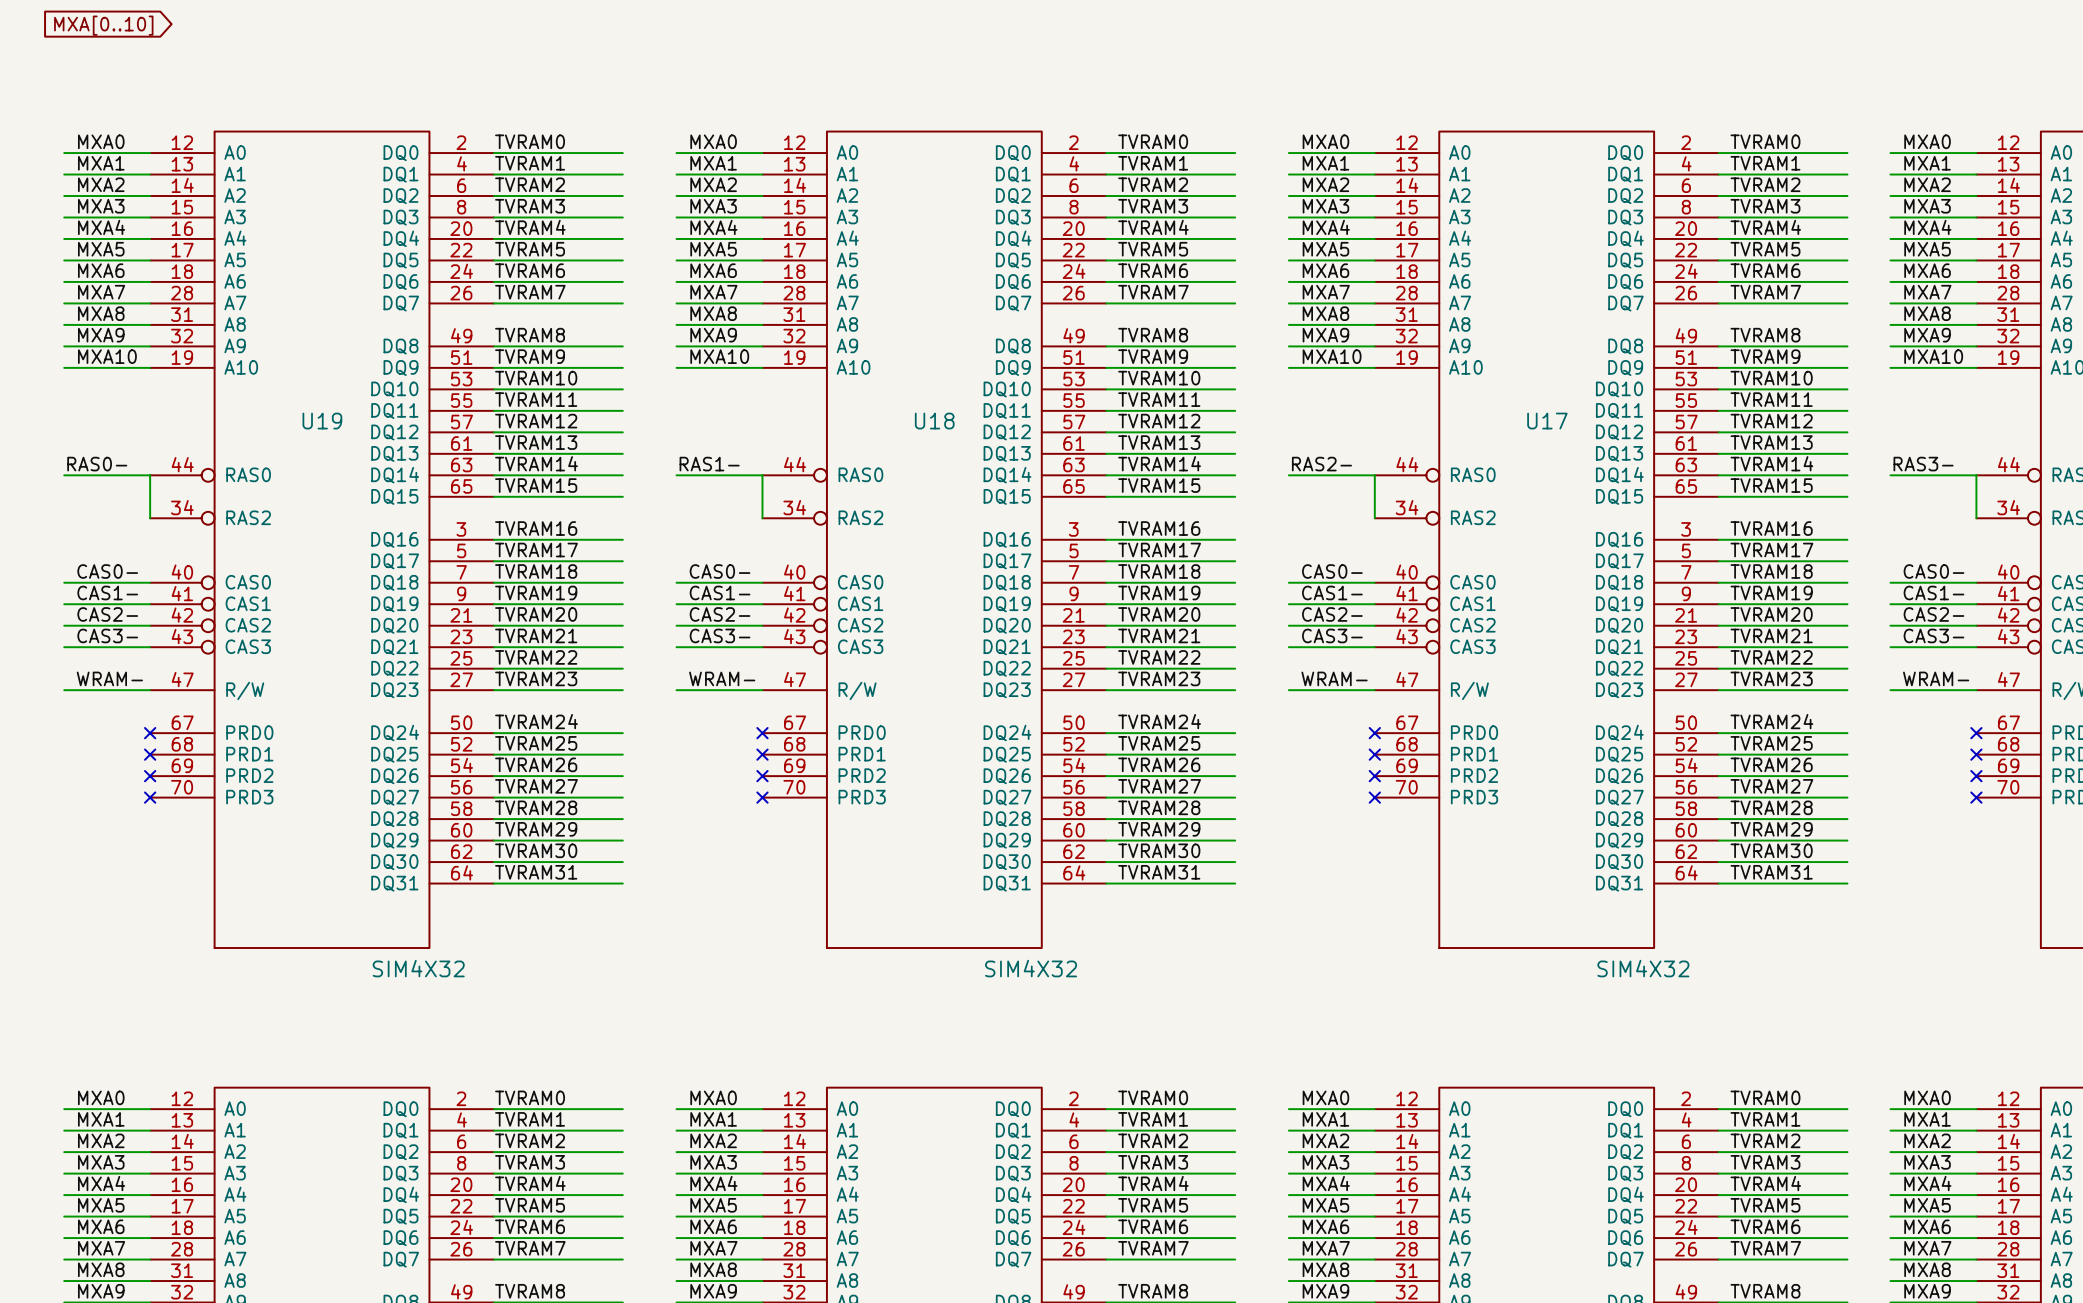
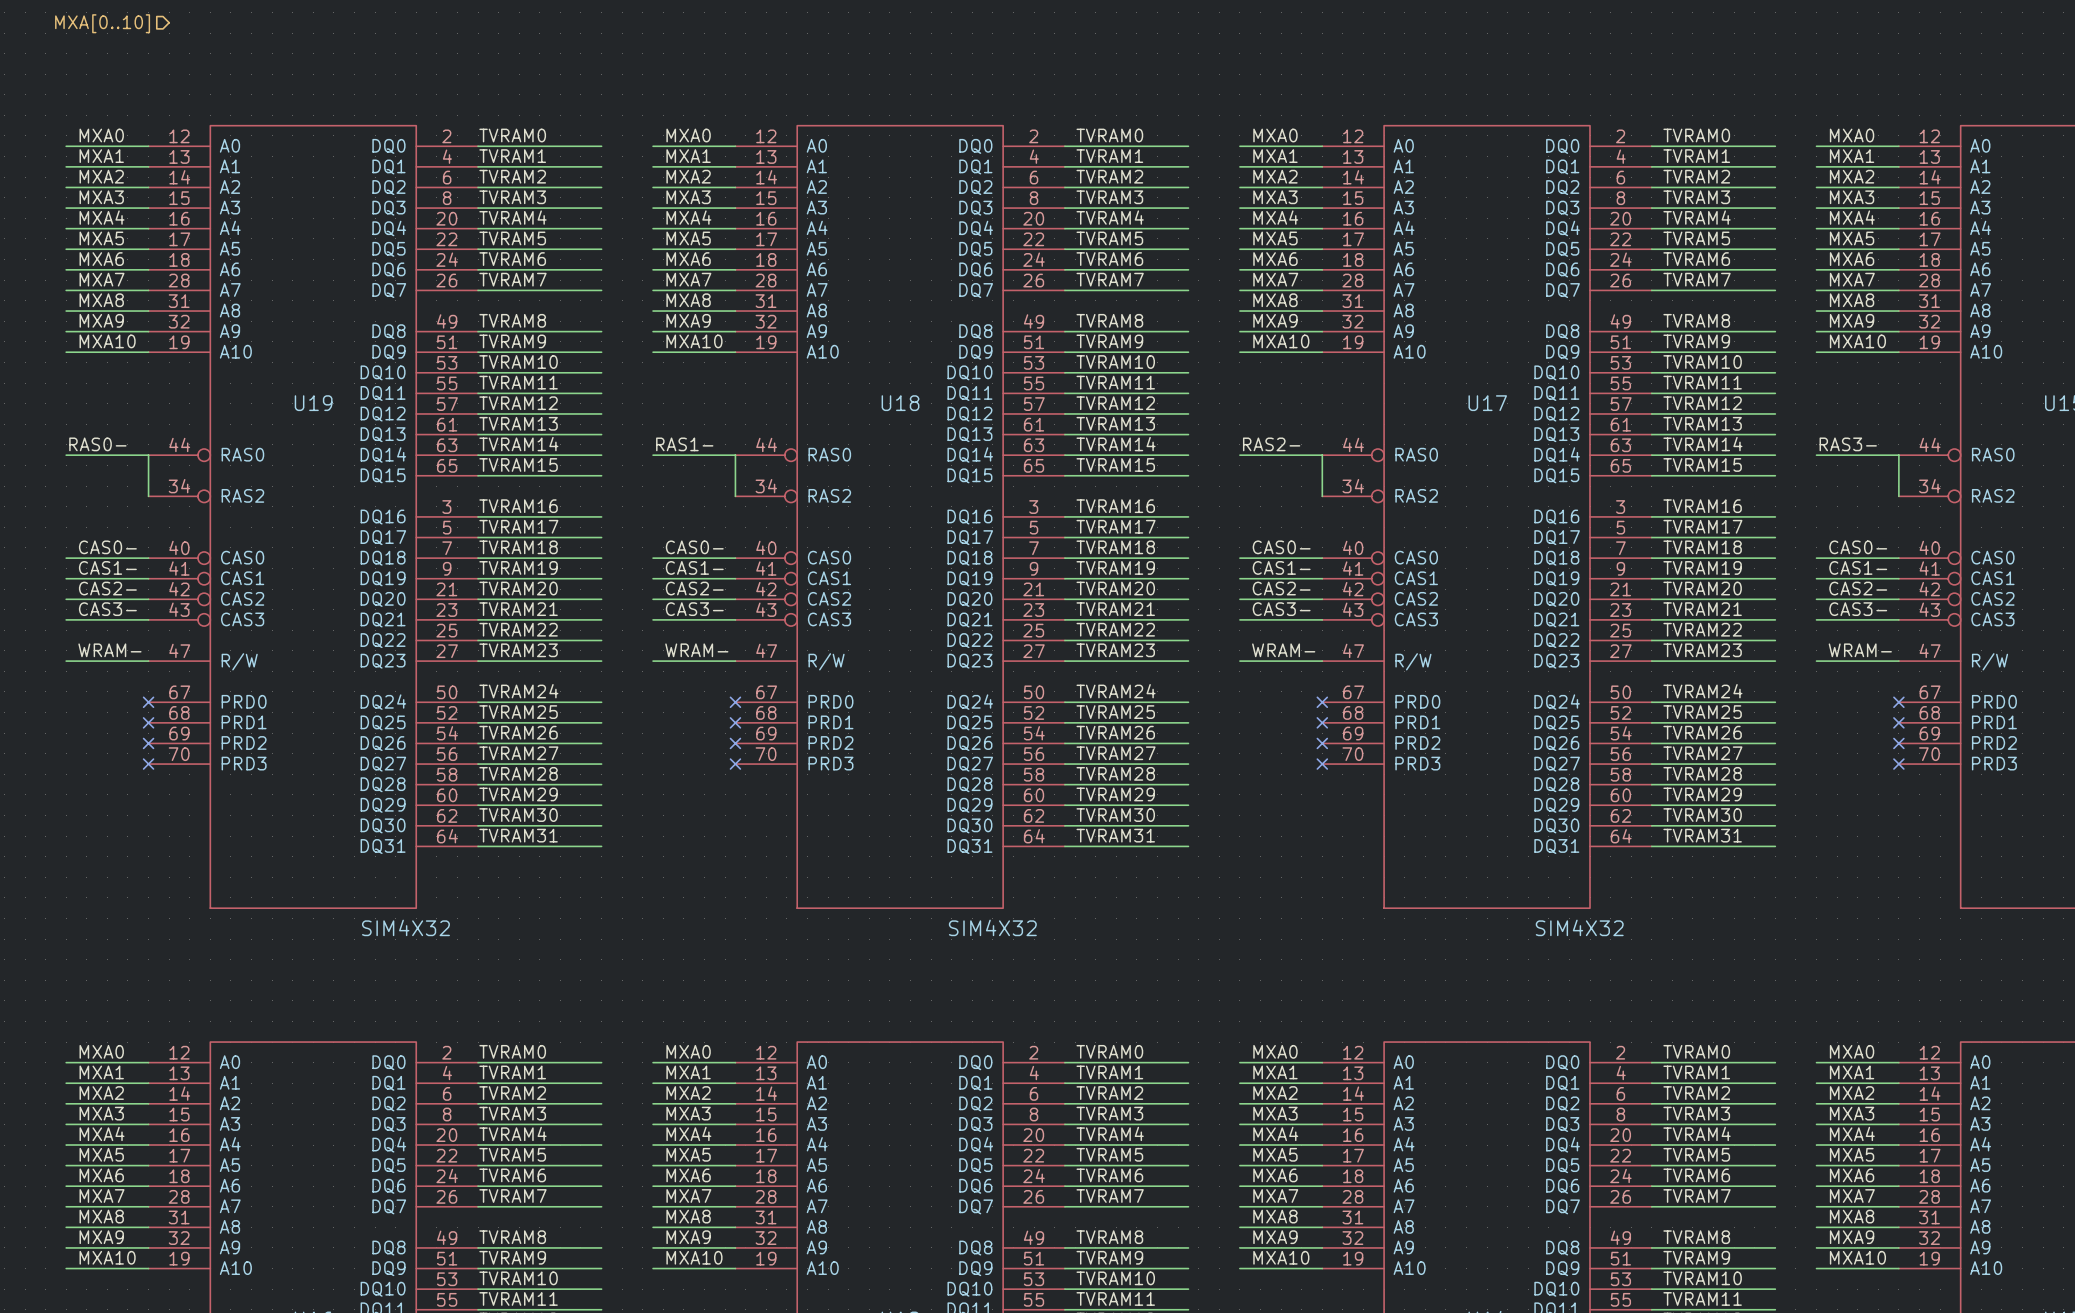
hierarchical label: none -> MXA[0..10] (102, 23)
global label: MXA[0..10] (103, 25) -> none

